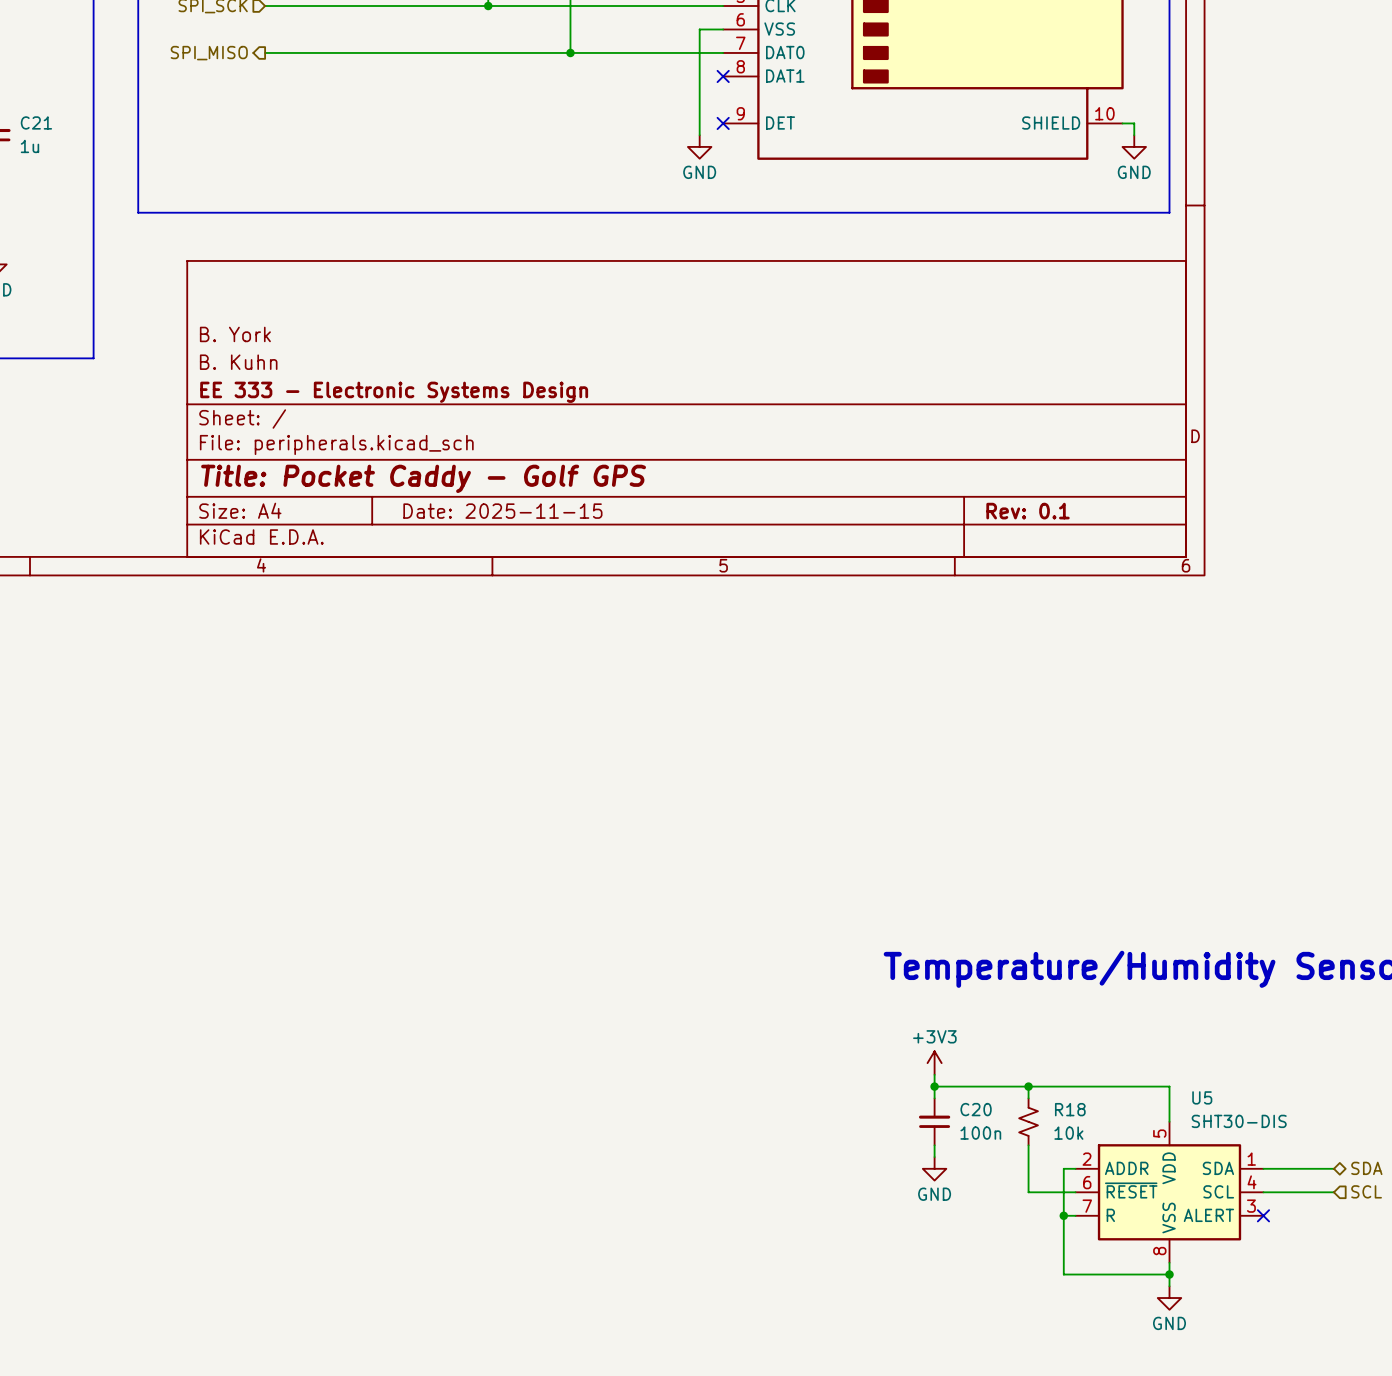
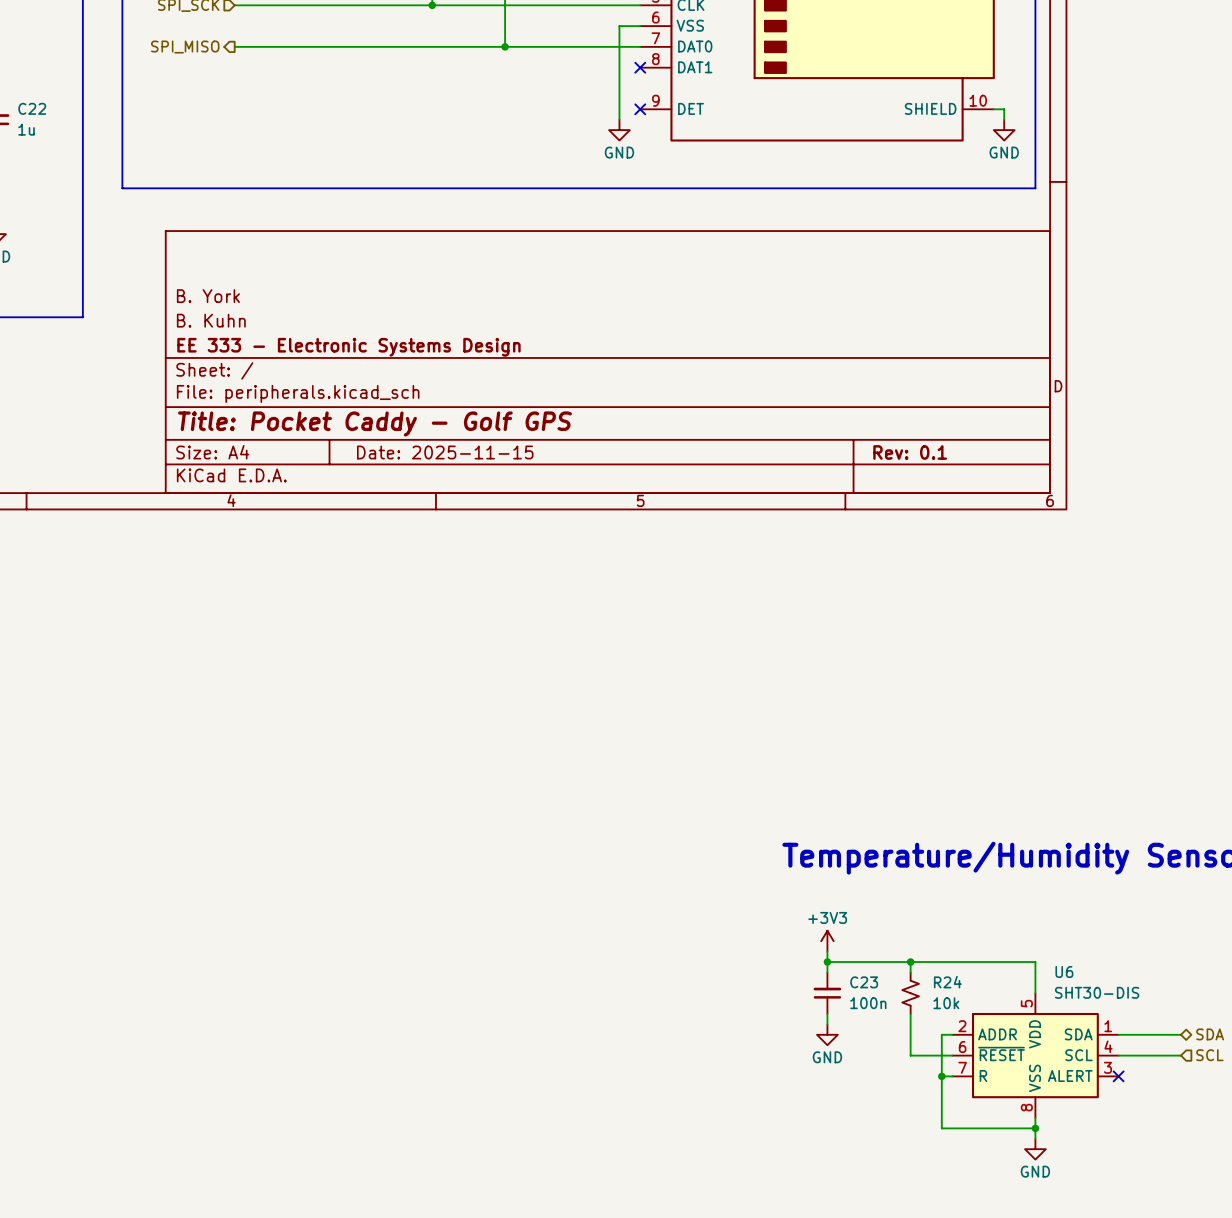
C21 name: C21 (36, 122) -> C22 (32, 108)
U5 name: U5 (1202, 1097) -> U6 (1064, 972)
C20 name: C20 (976, 1109) -> C23 (864, 982)
R18 name: R18 (1070, 1109) -> R24 (947, 982)

